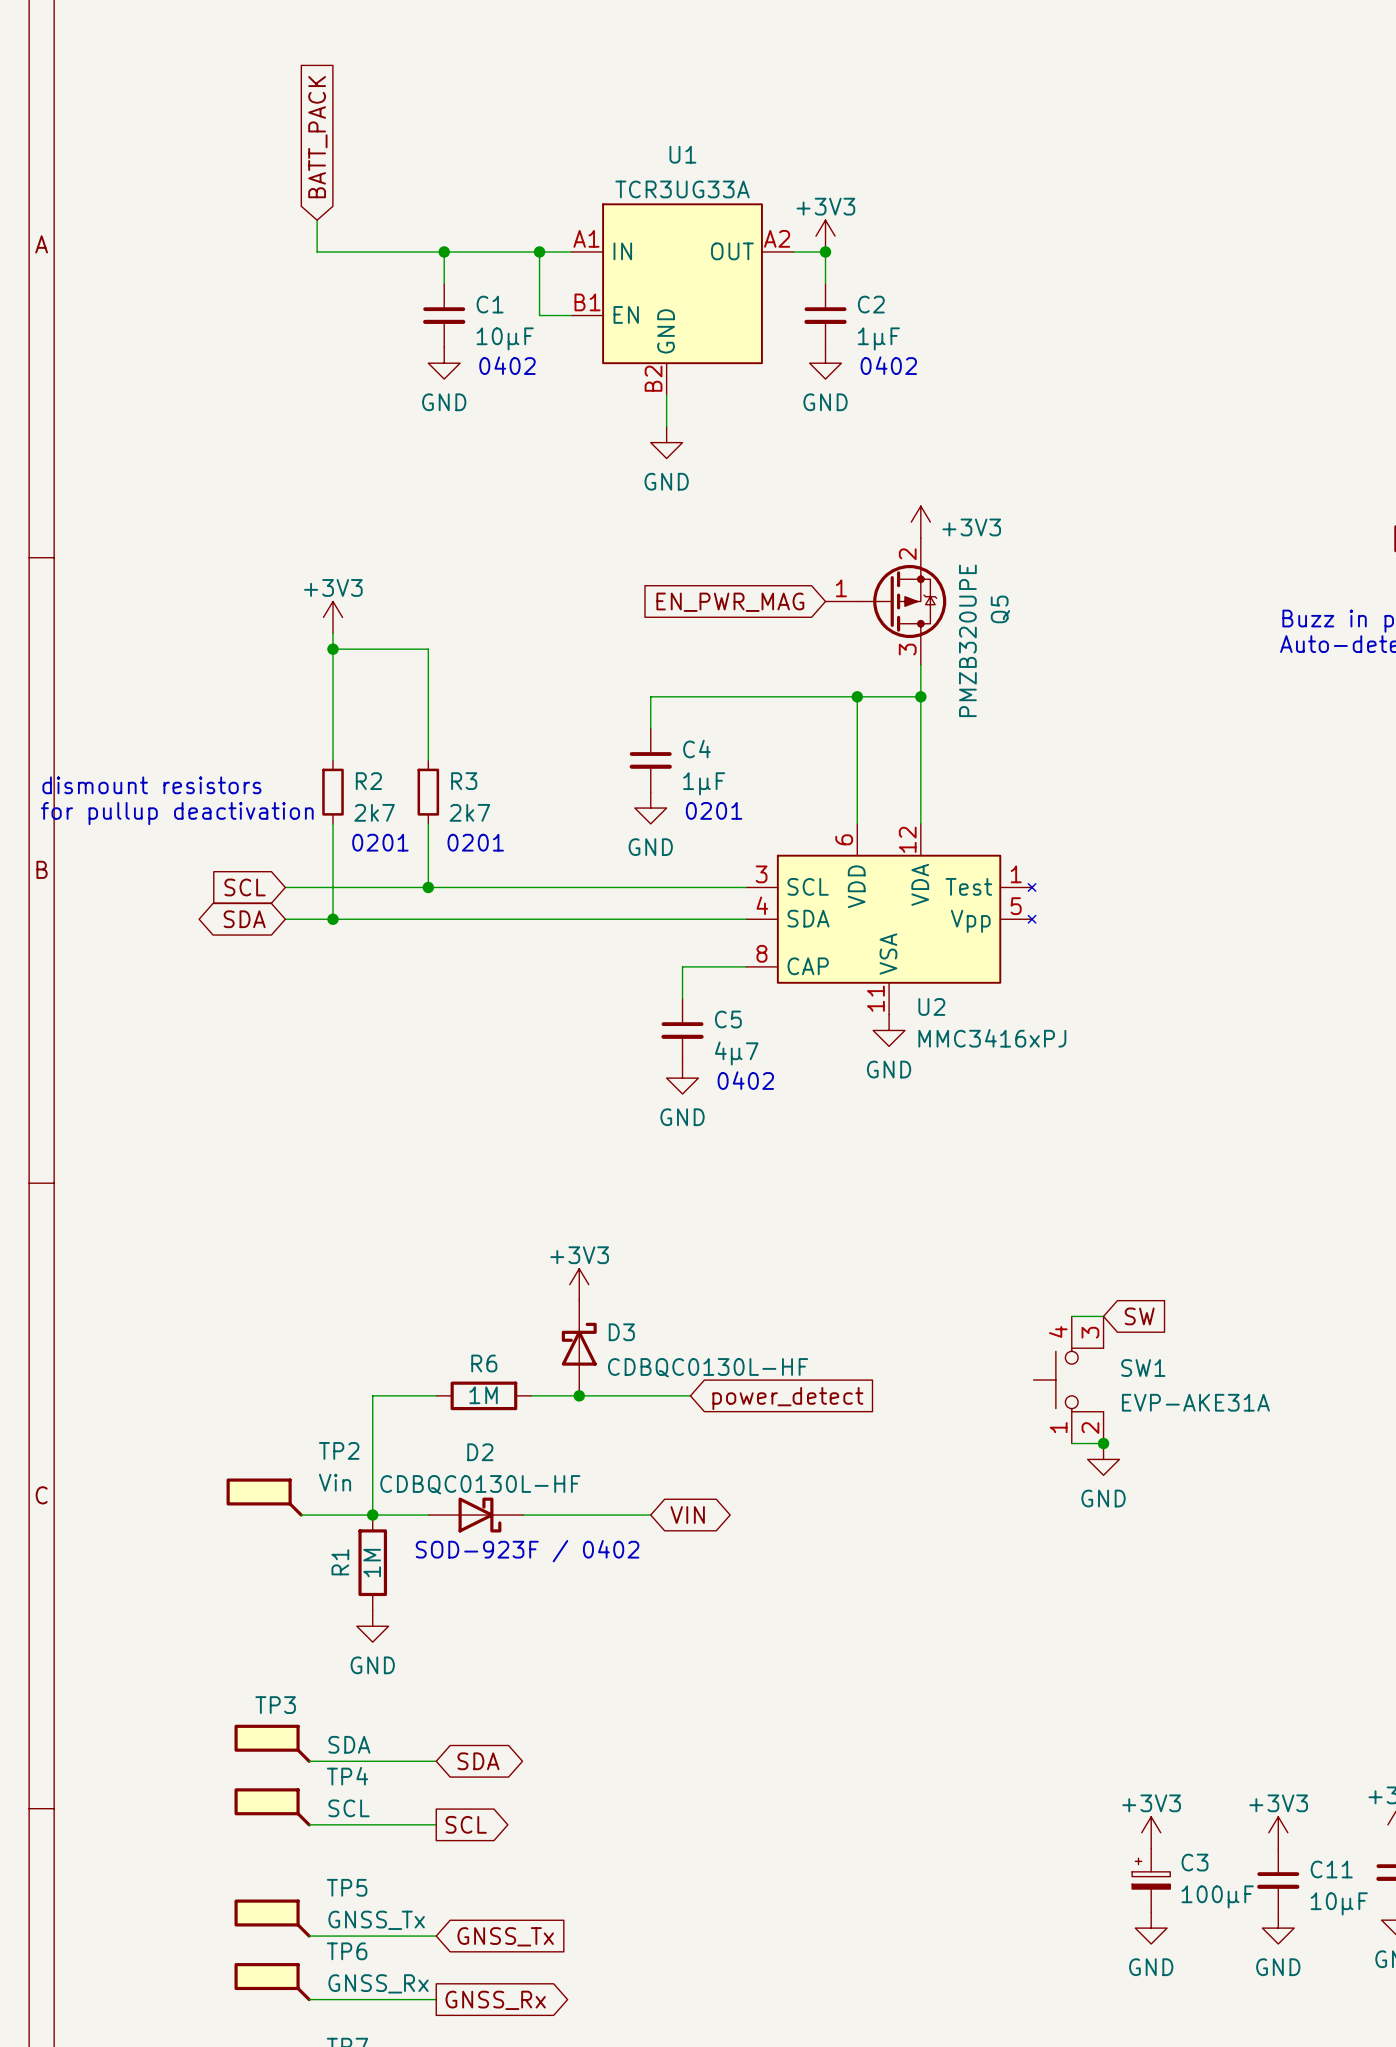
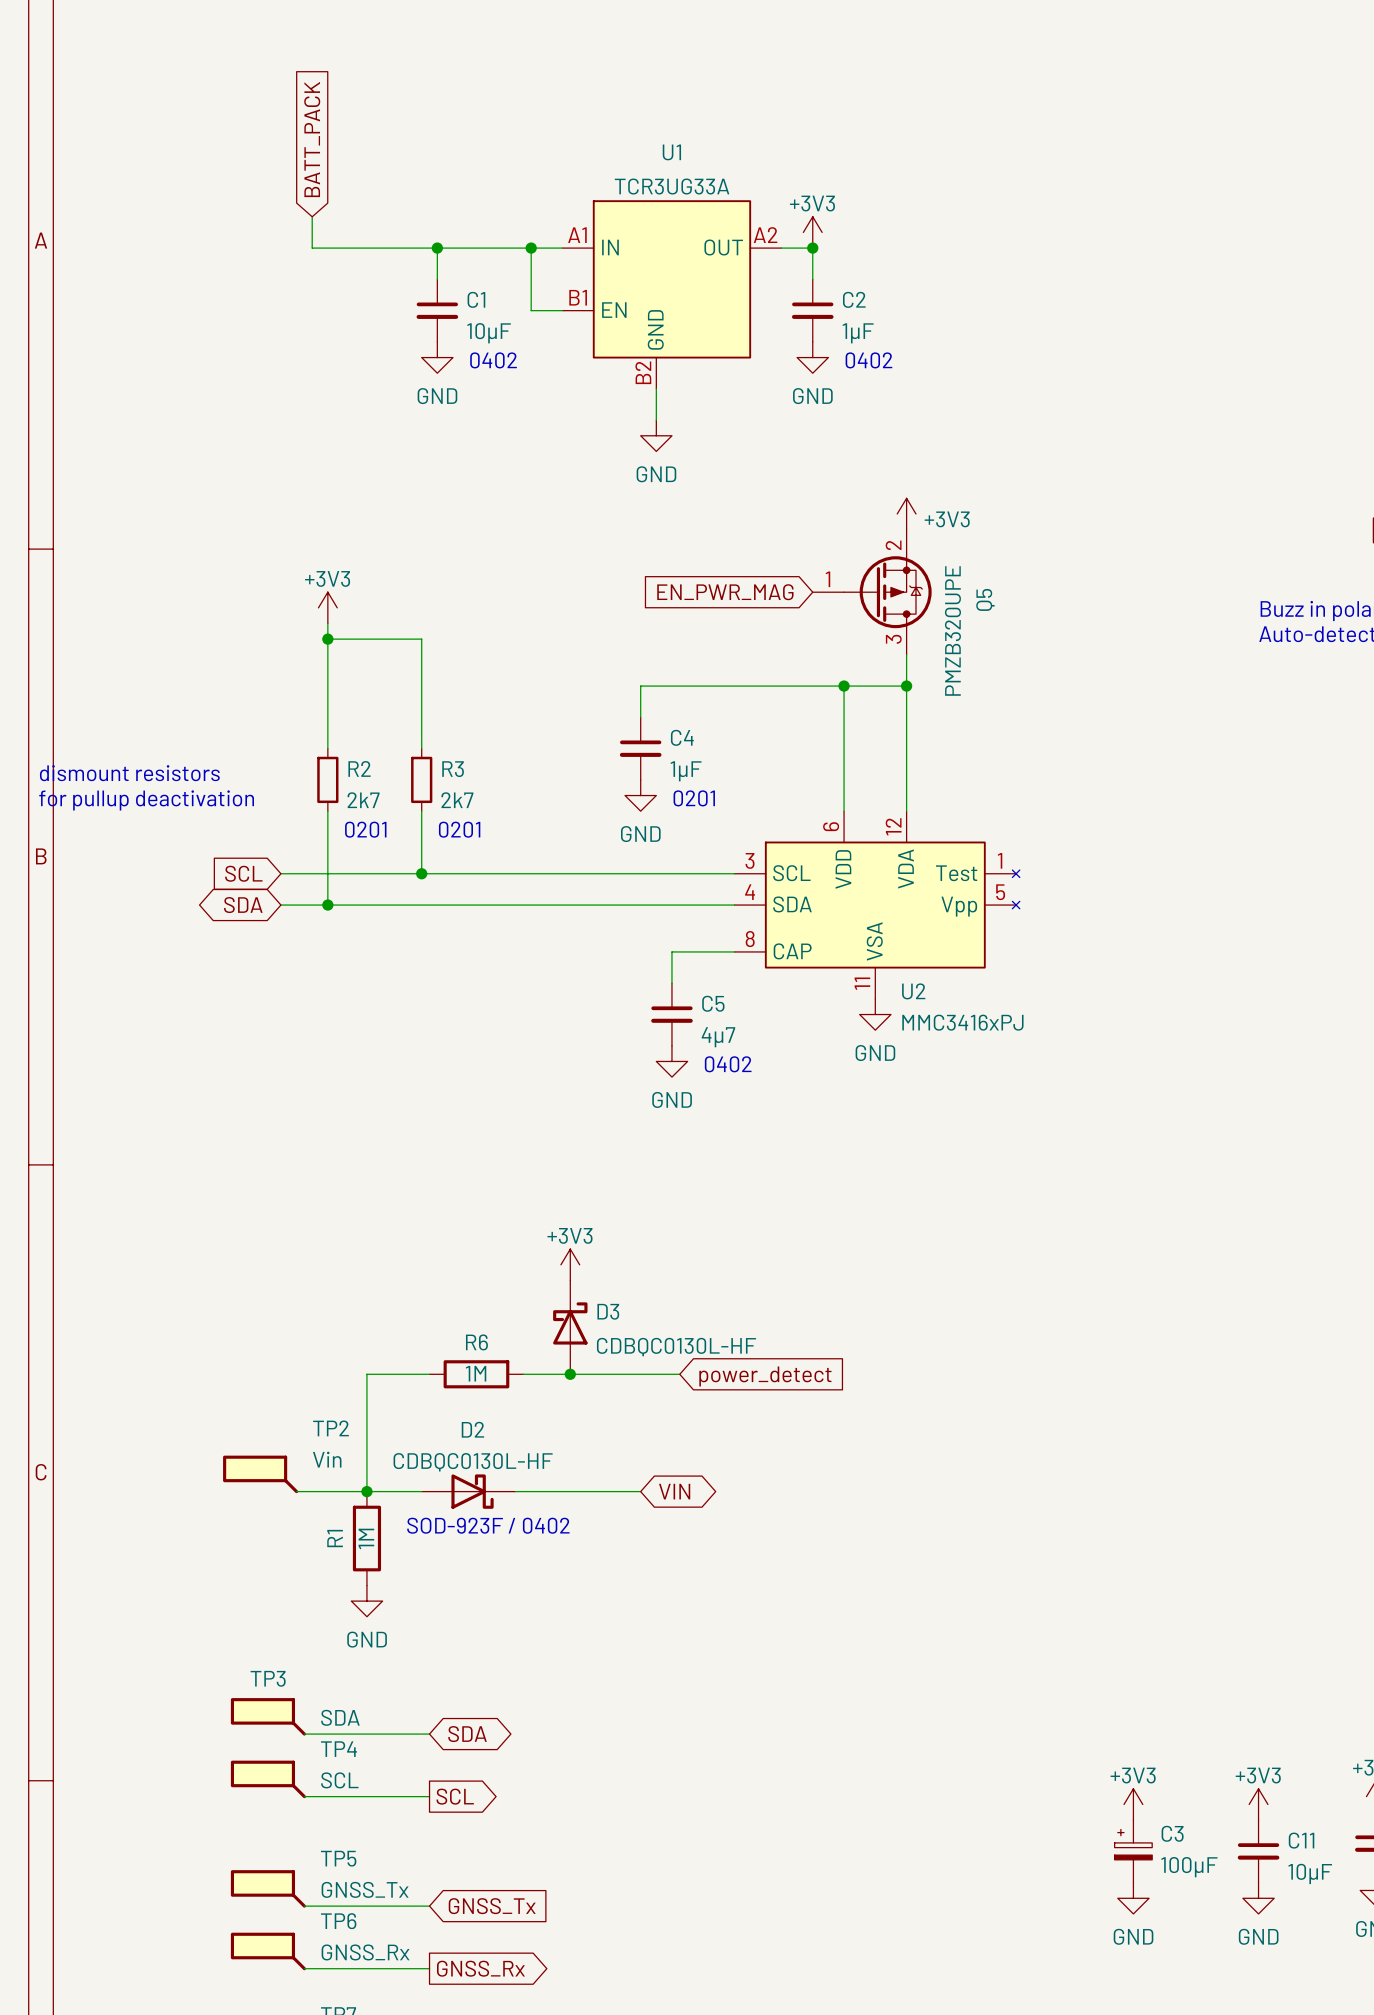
wire: (1071, 1316) (1103, 1316) -> none
global label: SW (1139, 1316) -> none
SW1: EVP-AKE31A (1068, 1379) -> none
wire: (1071, 1443) (1103, 1443) -> none
junction: (1103, 1443) -> none
power symbol: GND (1103, 1459) -> none

